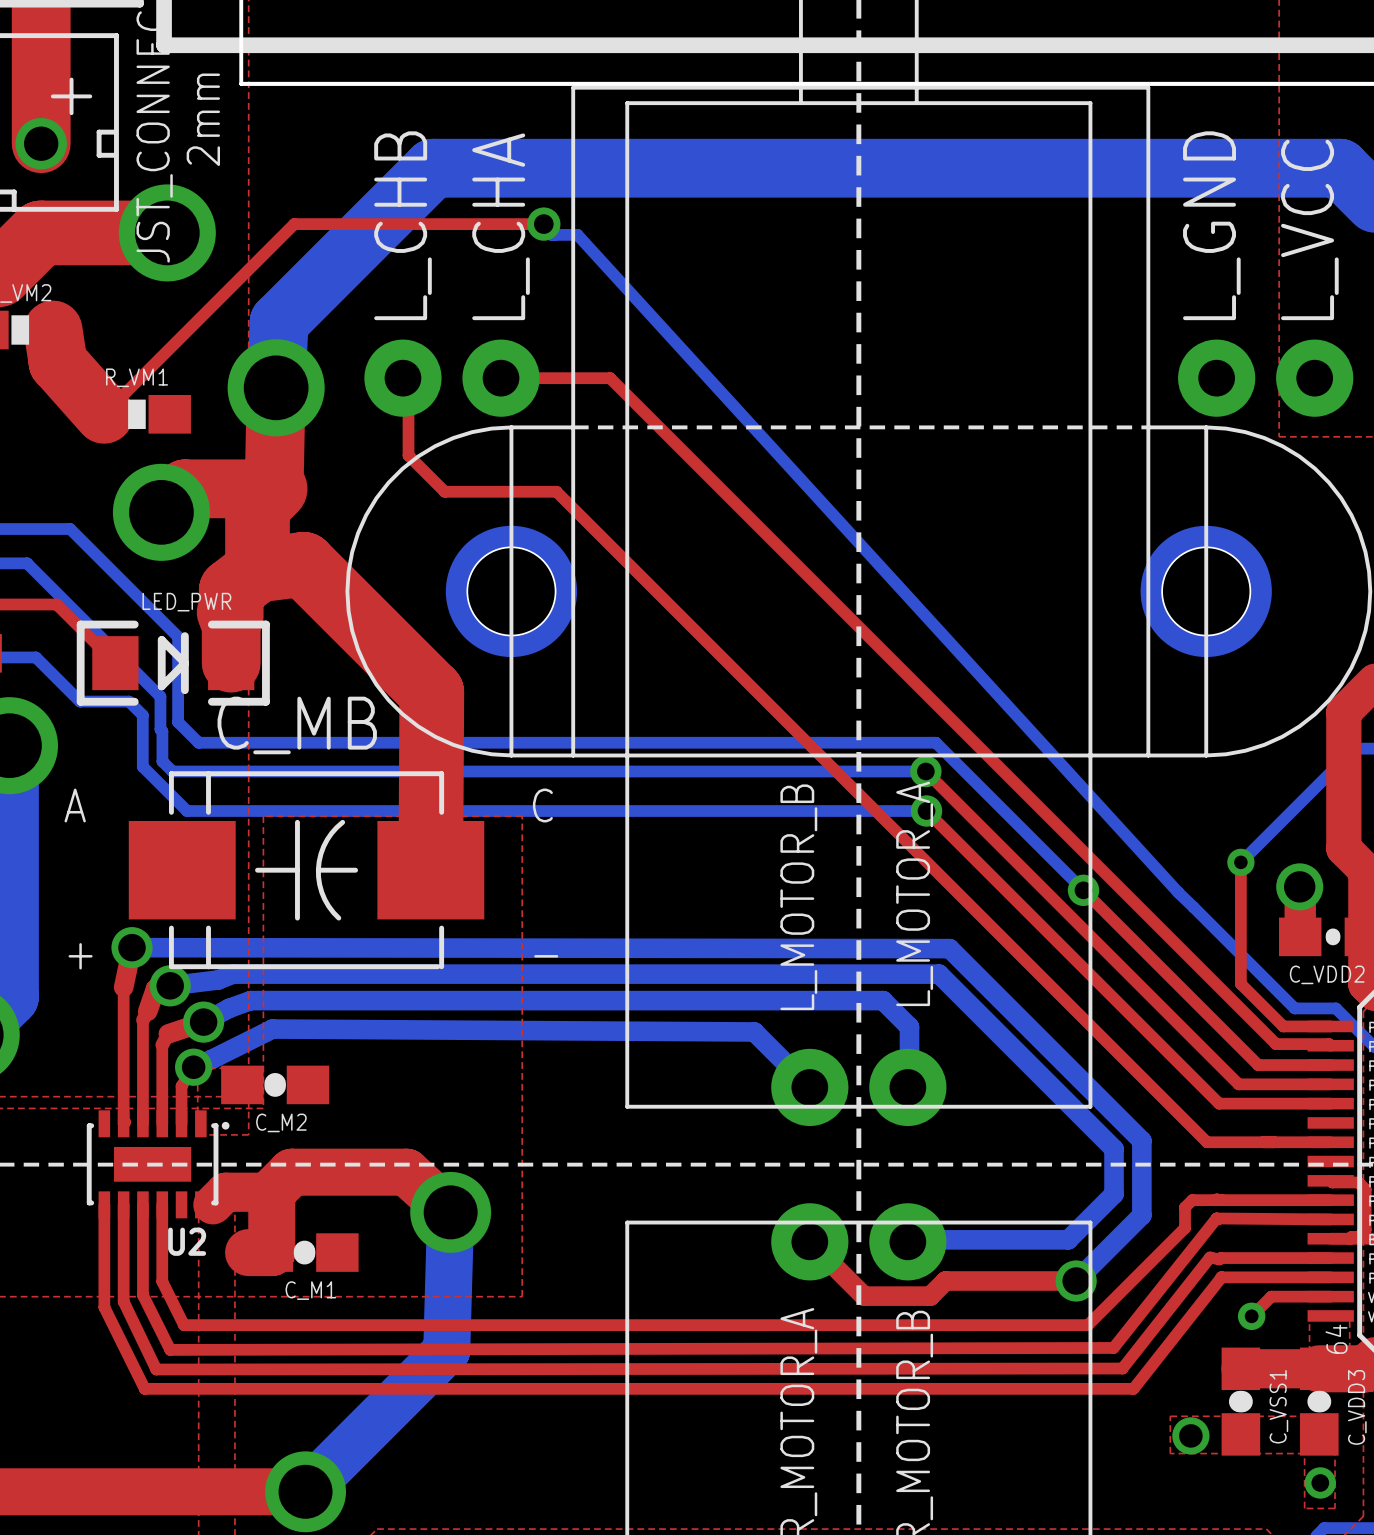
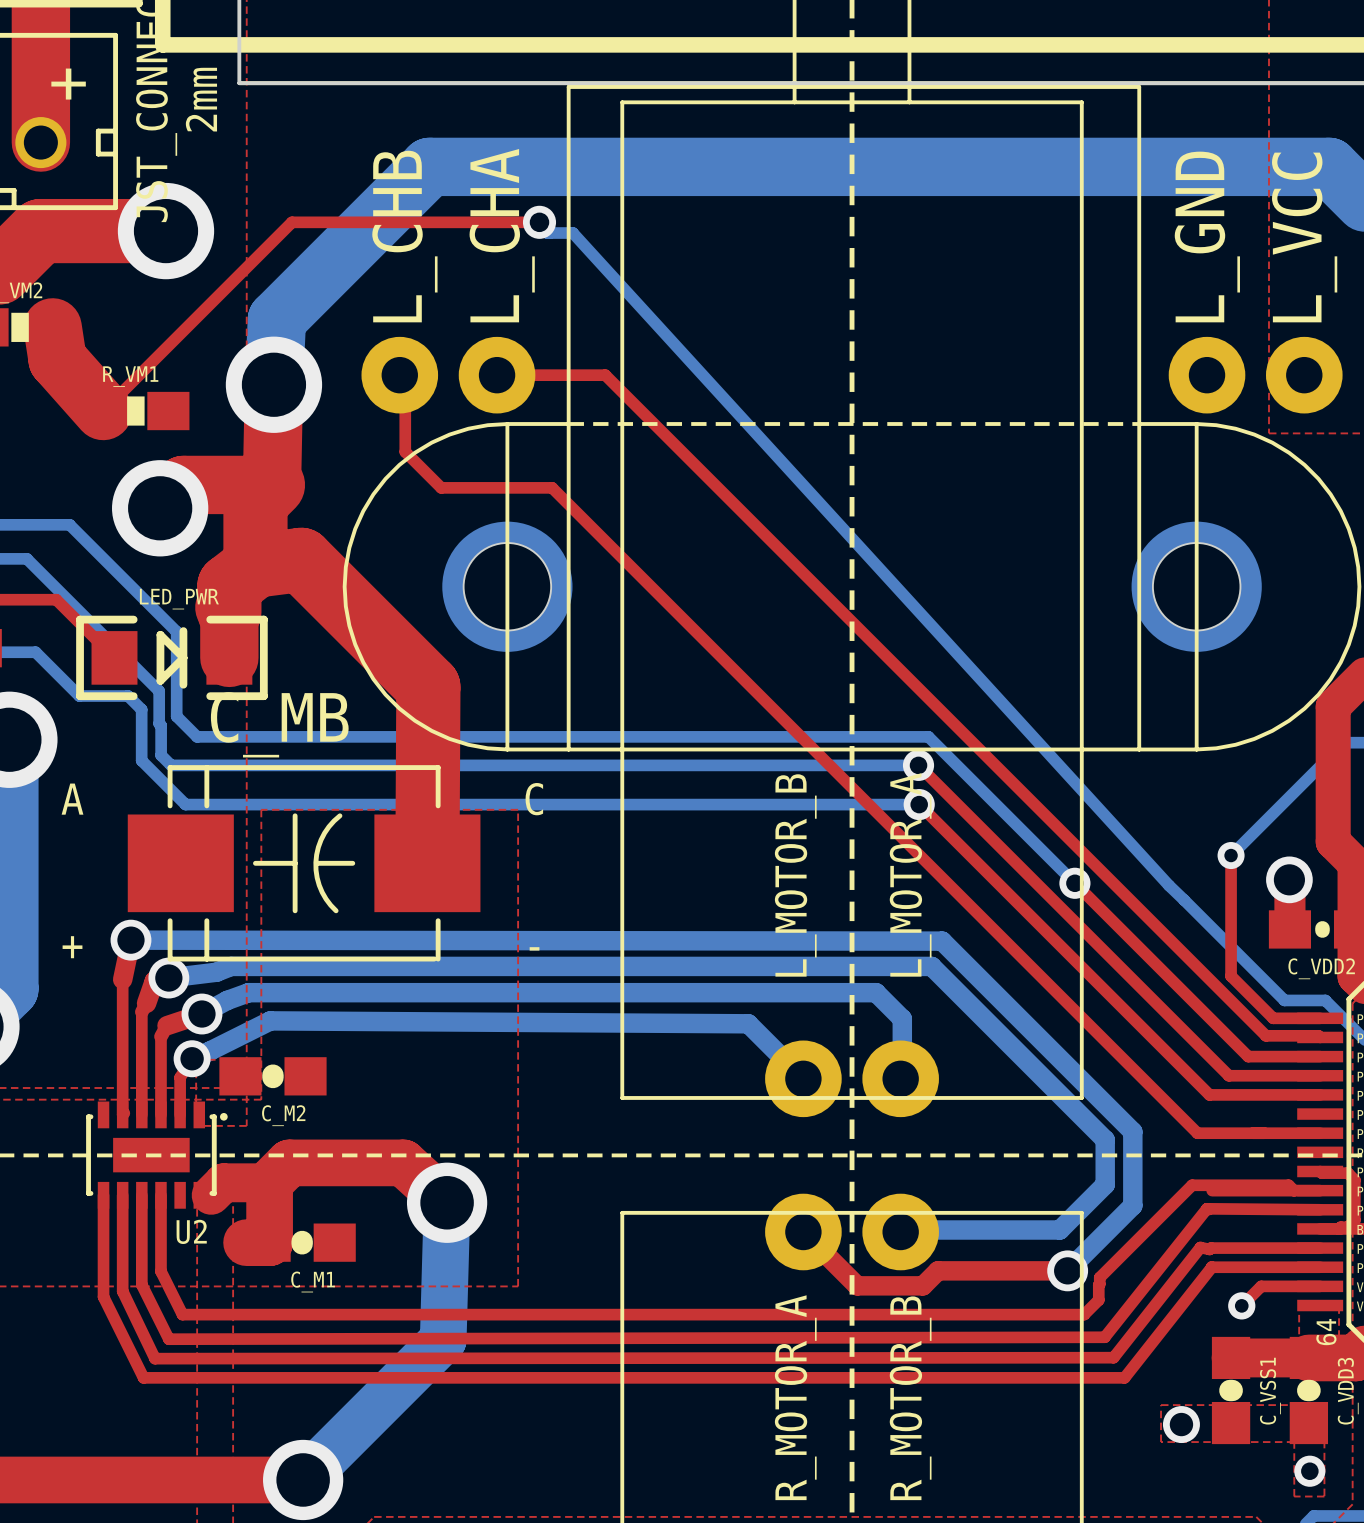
top track: (1221, 1200) (1192, 1200) (1185, 1207) (1185, 1228) (1087, 1325) -> (1294, 1190) (1288, 1185) (1192, 1185) (1099, 1277) (1098, 1300) (1084, 1314) (1079, 1314)

